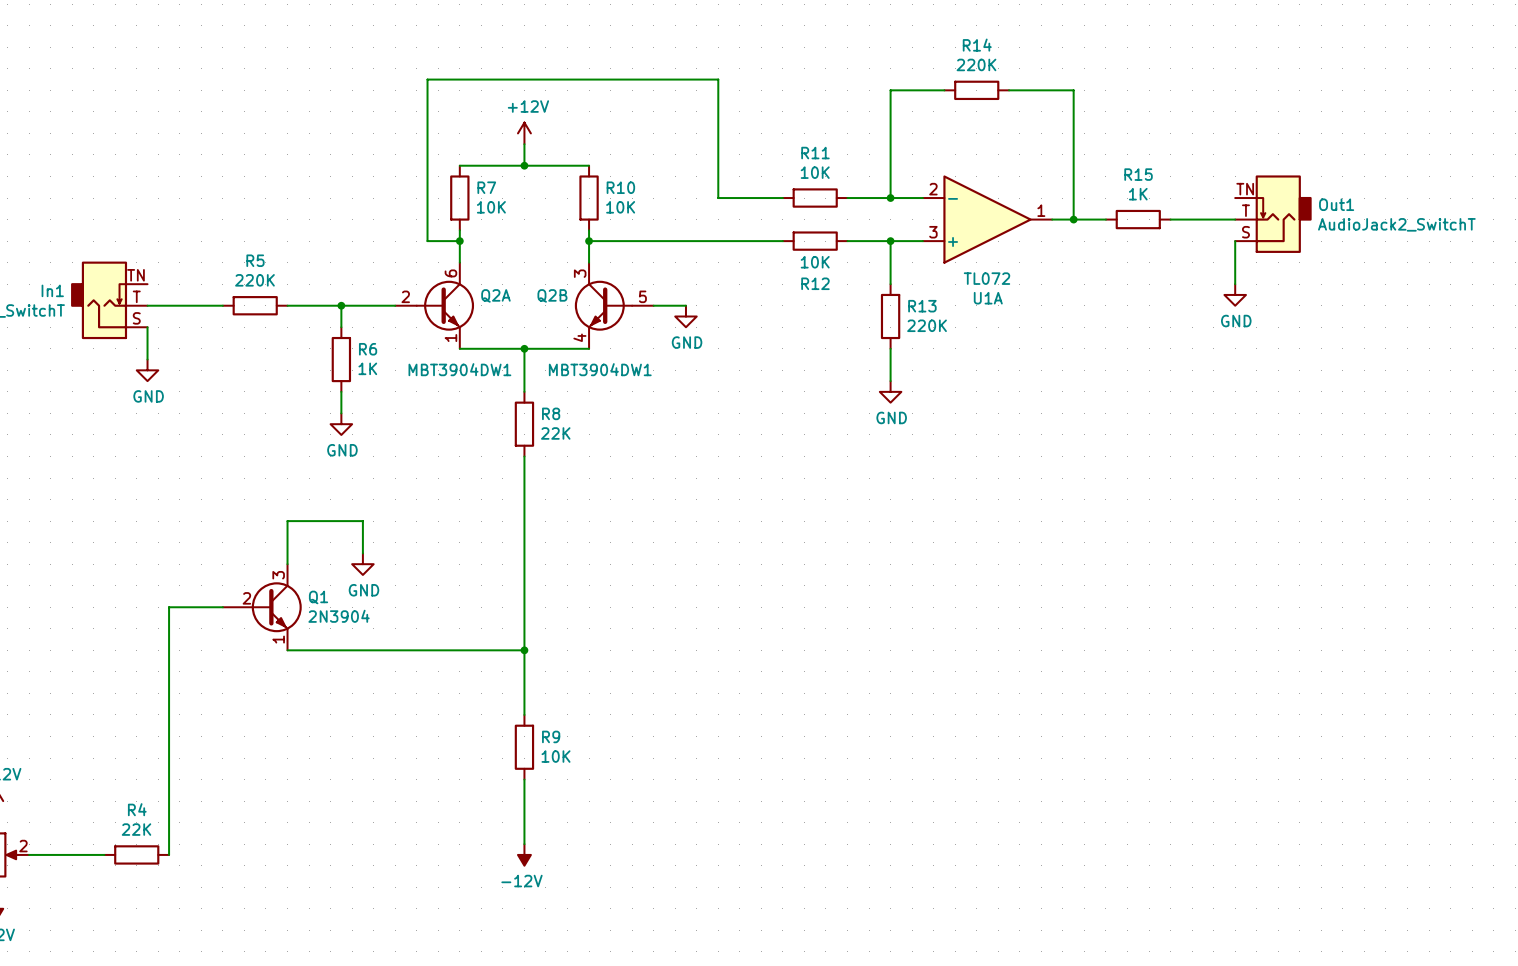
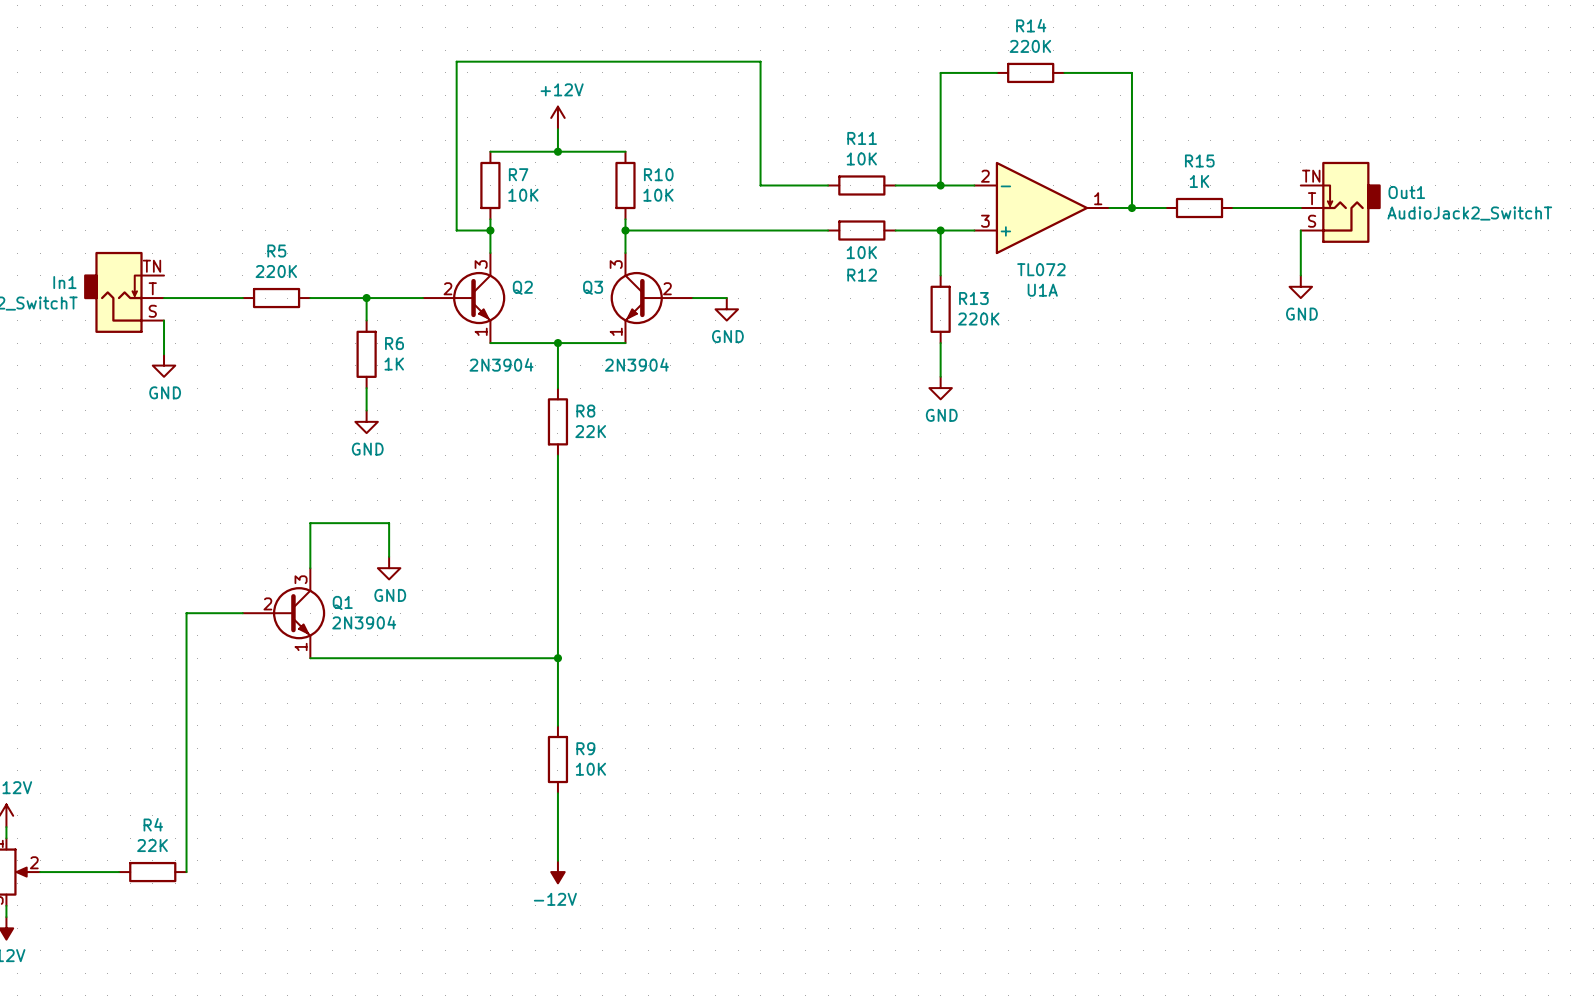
Q2A: MBT3904DW1 (434, 305) -> none
Q2: none -> 2N3904 (464, 298)
Q2B: MBT3904DW1 (614, 305) -> none
Q3: none -> 2N3904 (651, 298)

